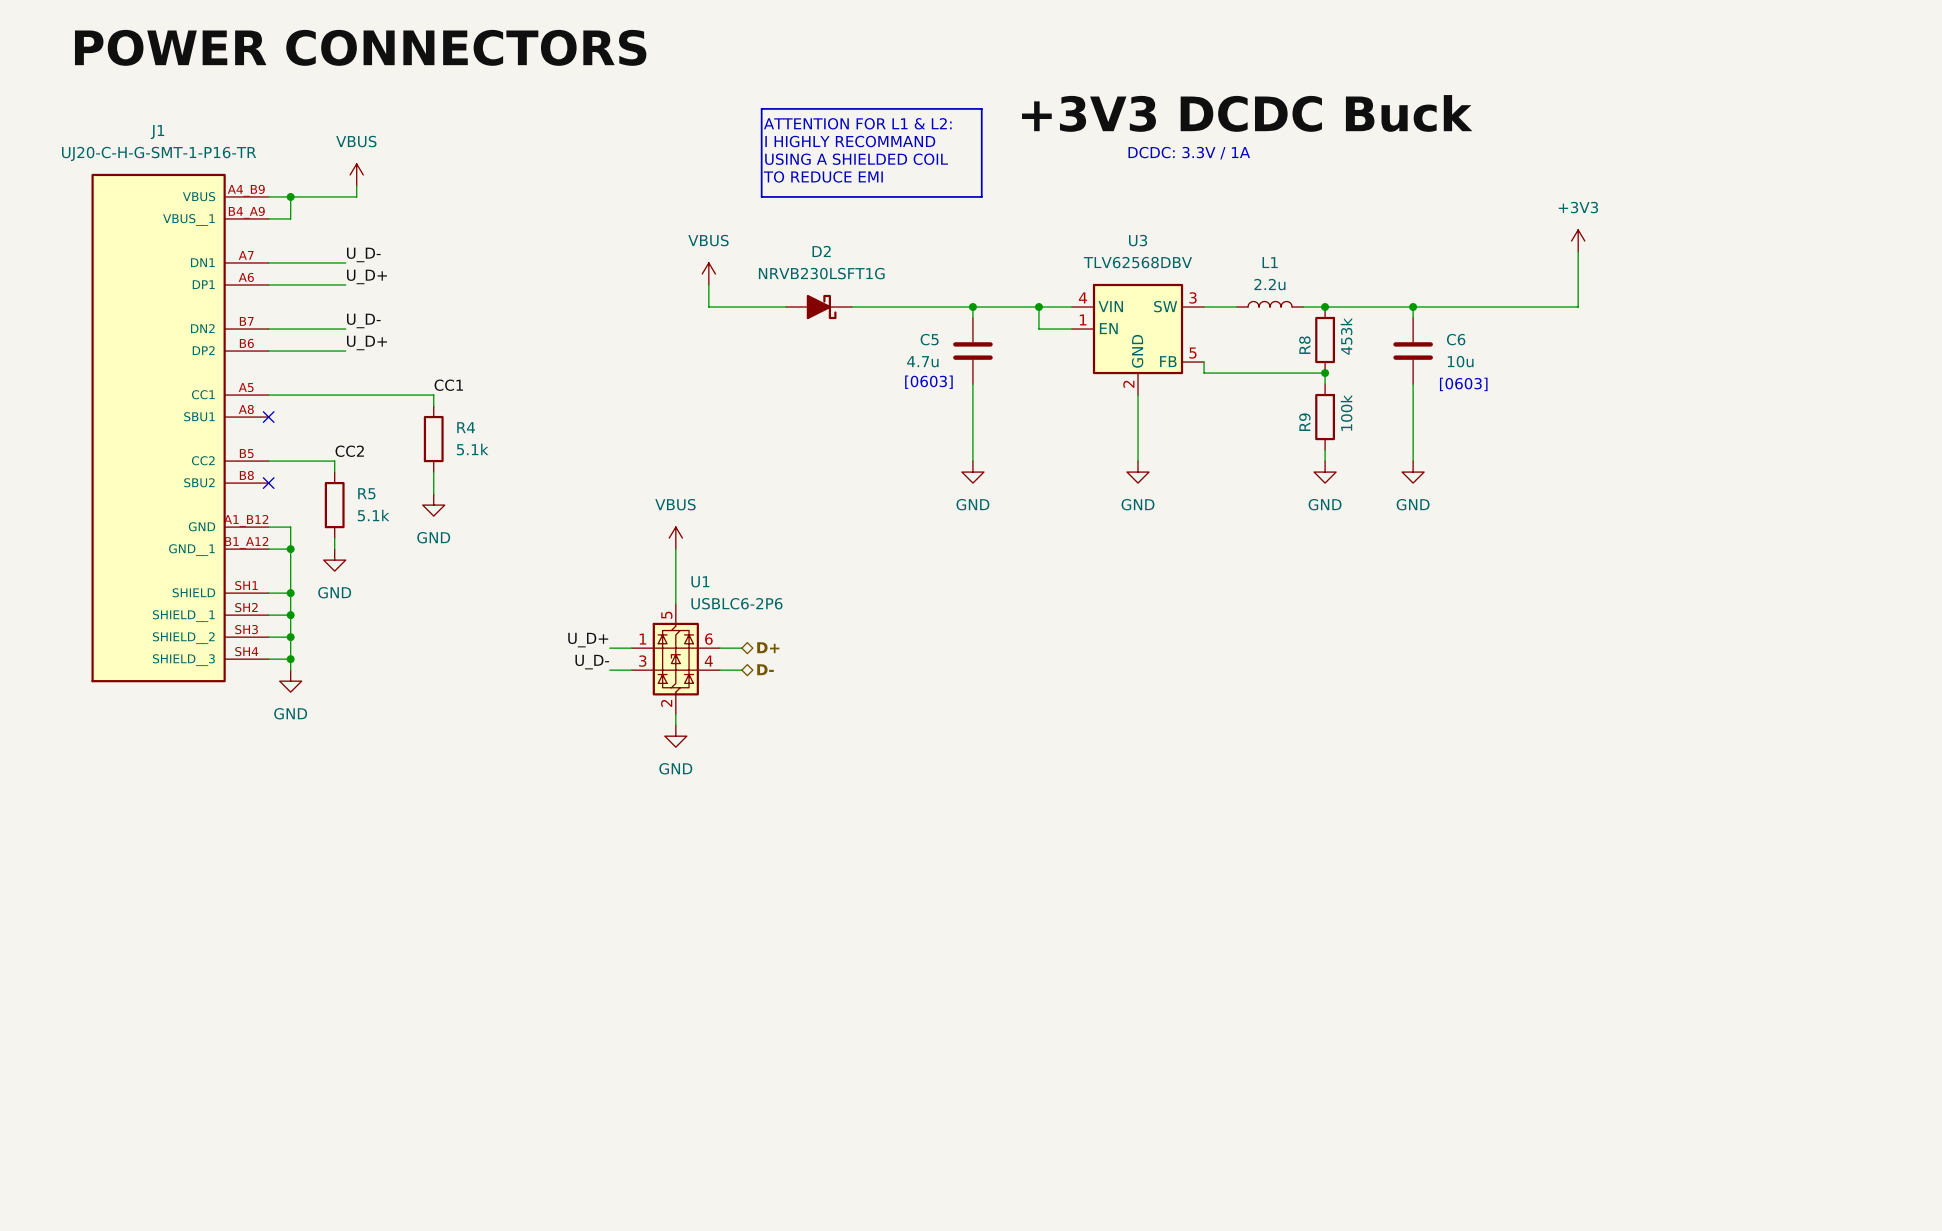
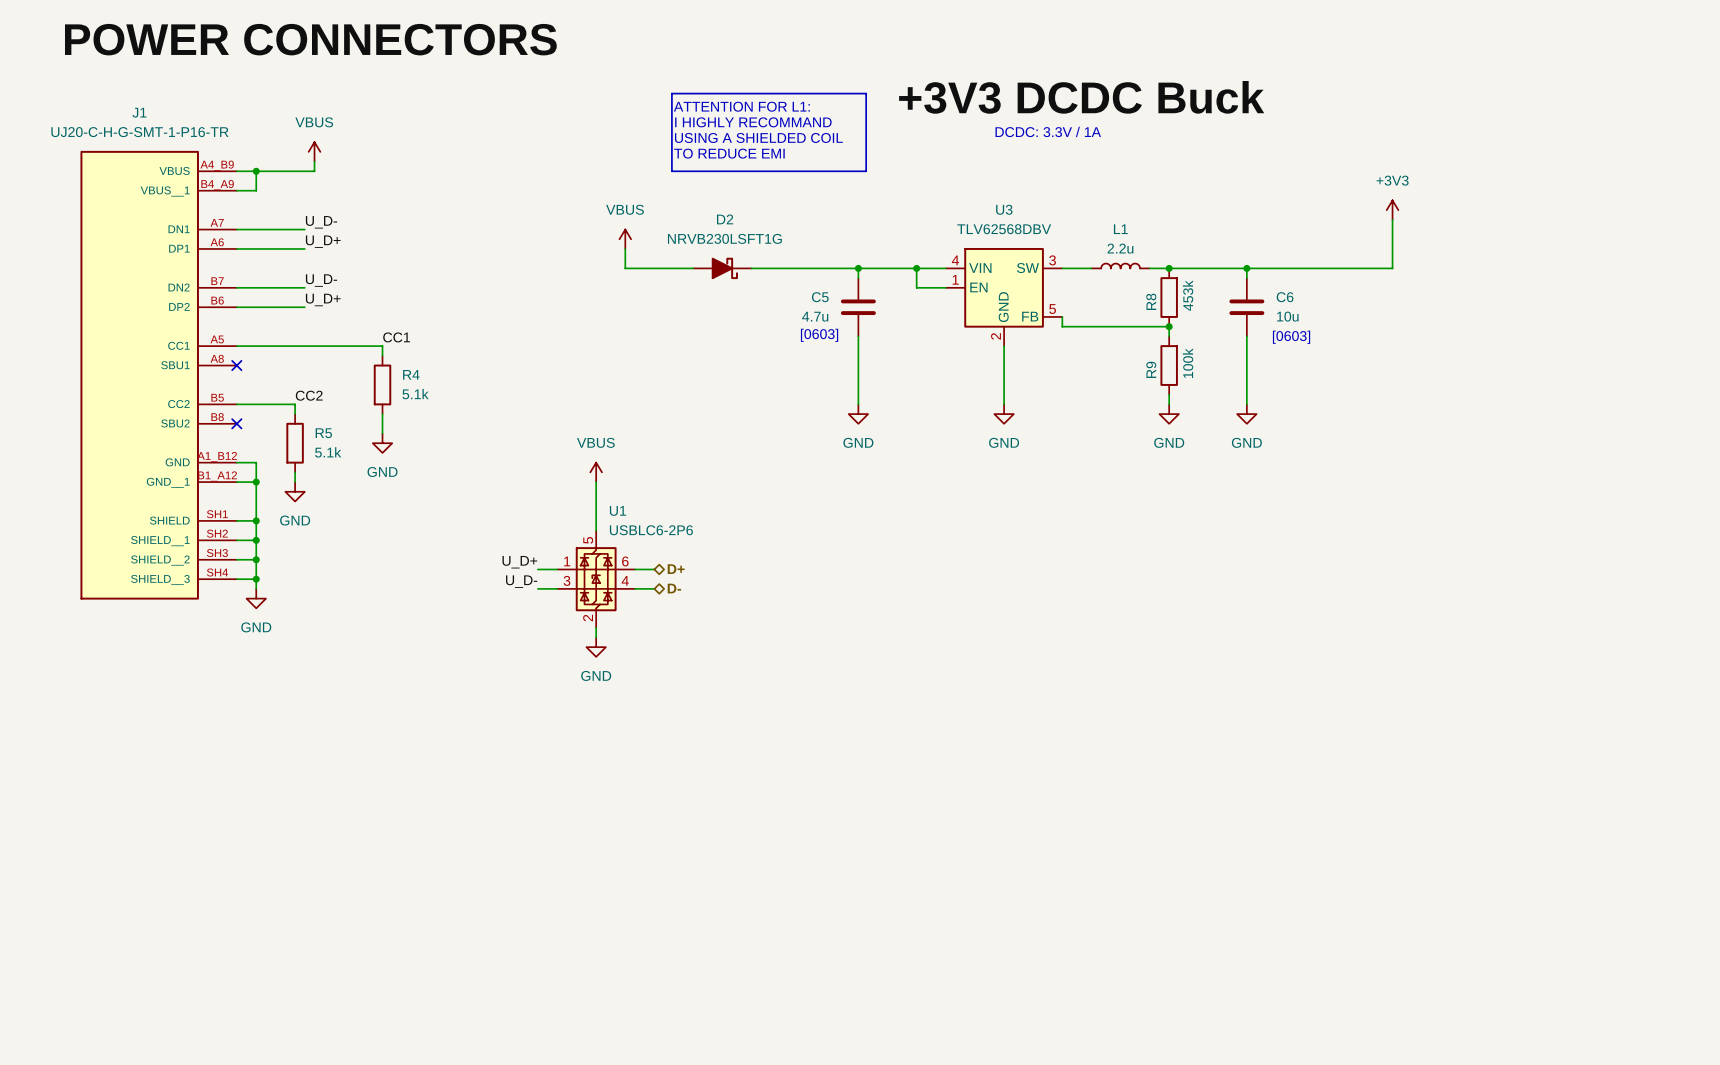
text: ATTENTION FOR L1 & L2: (857, 123) -> ATTENTION FOR L1: (741, 106)

